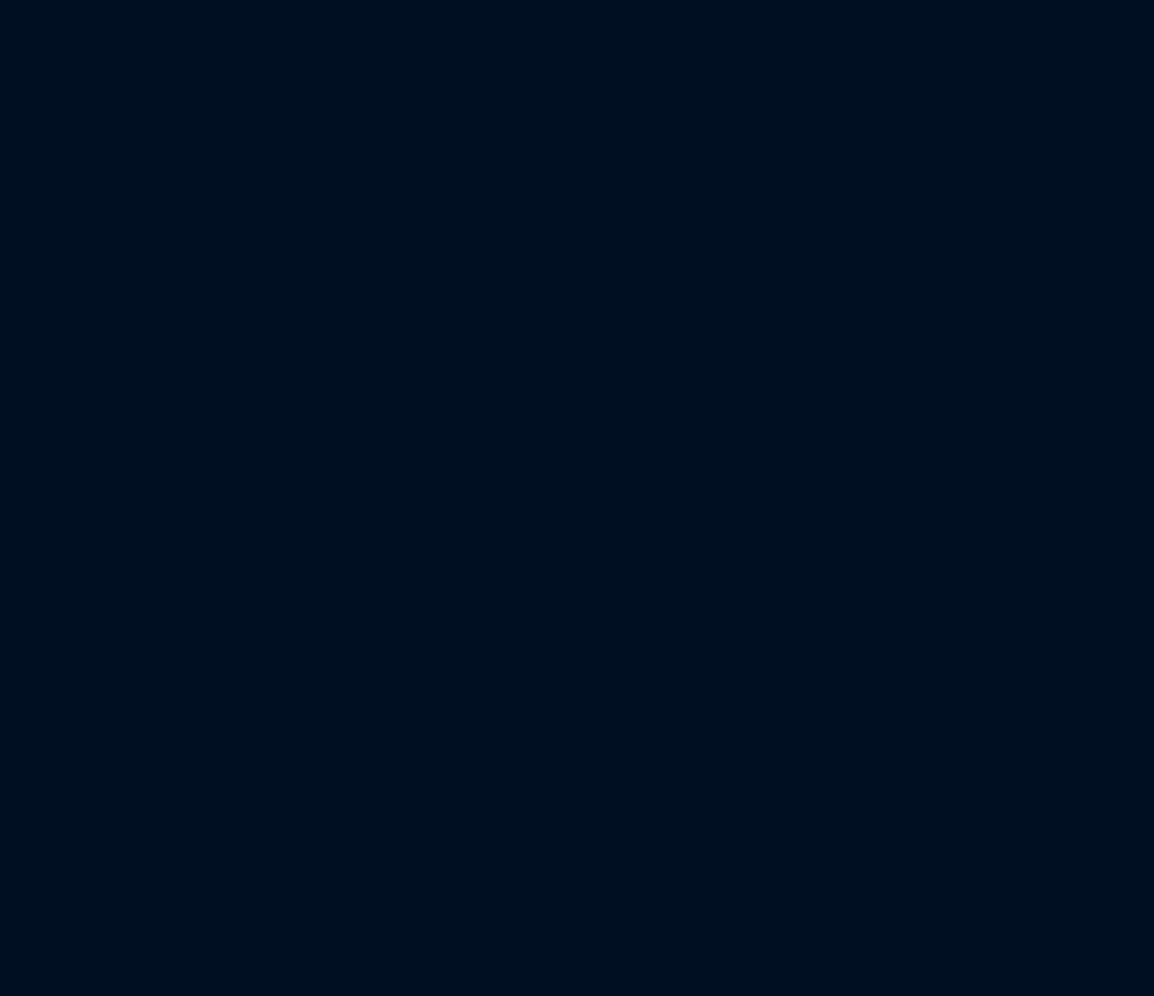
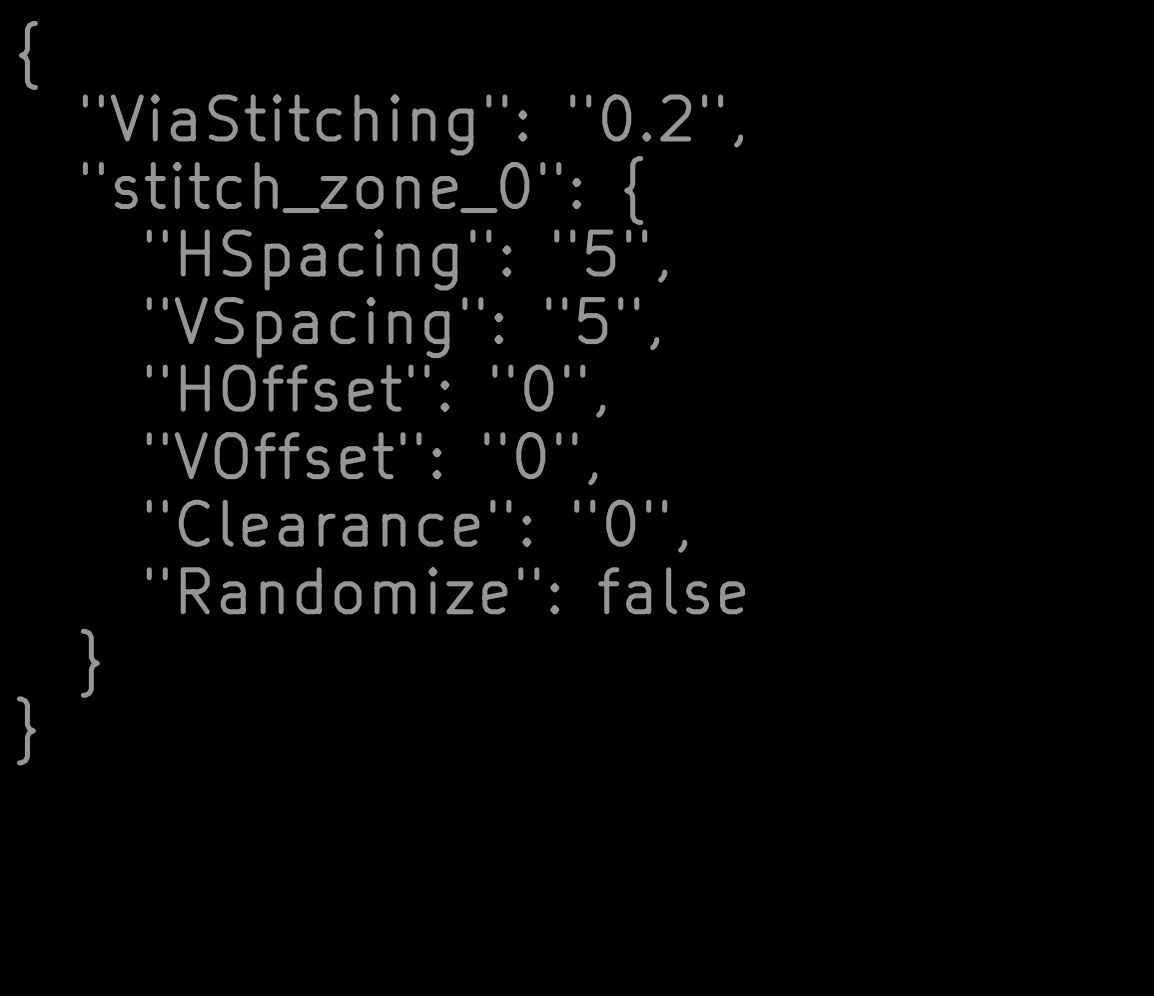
text: none -> { (28, 55)
text: none -> "ViaStitching": "0.2", (412, 124)
text: none -> "stitch_zone_0": { (363, 190)
text: none -> "HSpacing": "5", (406, 260)
text: none -> "VSpacing": "5", (402, 327)
text: none -> "HOffset": "0", (376, 391)
text: none -> "VOffset": "0", (372, 458)
text: none -> "Clearance": "0", (416, 526)
text: none -> "Randomize": false (445, 590)
text: none -> } (90, 663)
text: none -> } (26, 730)

